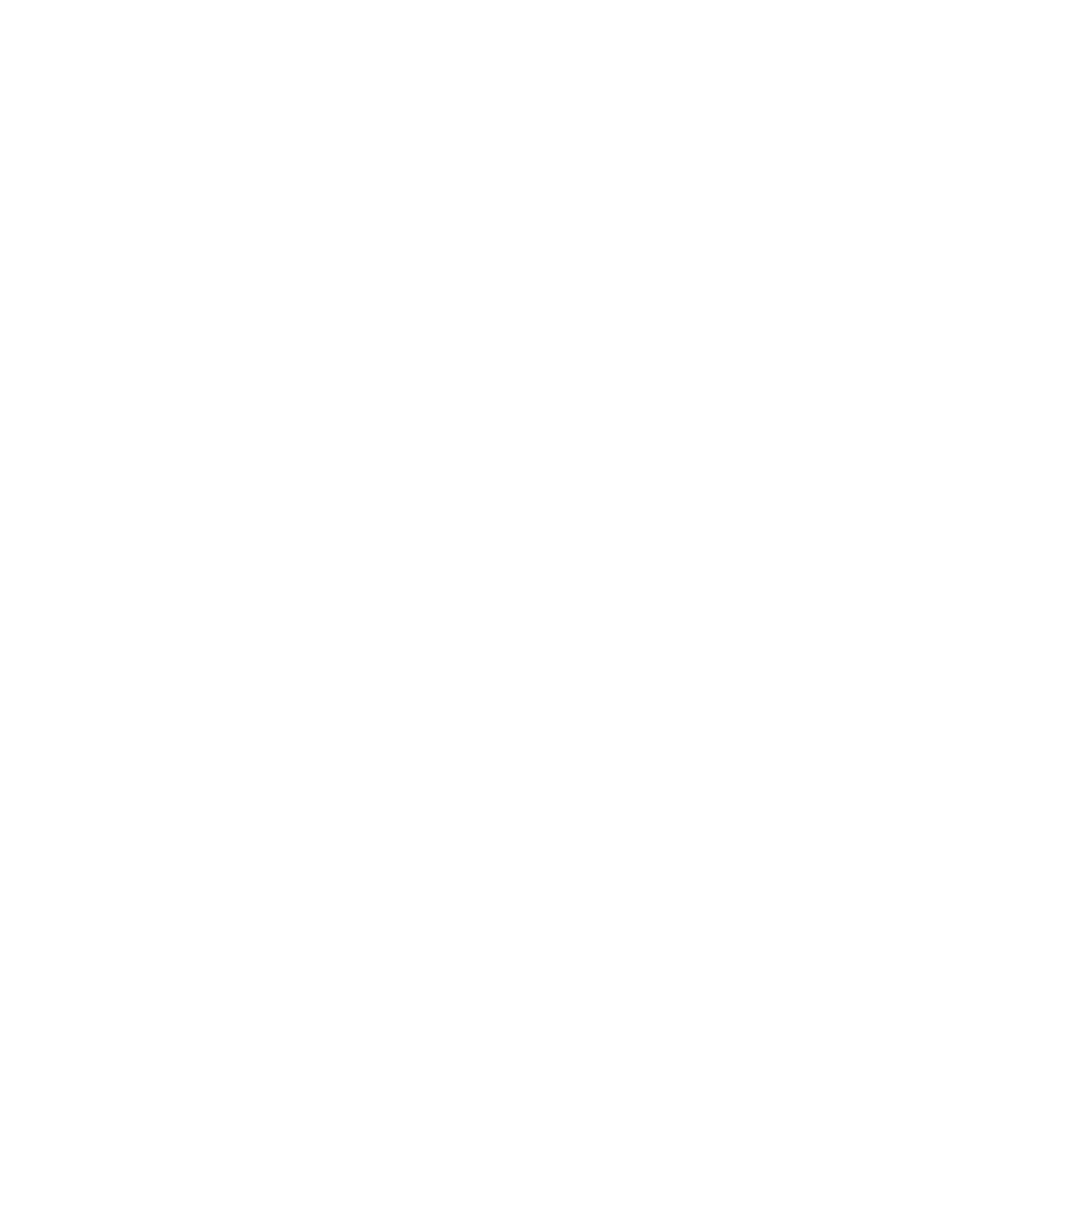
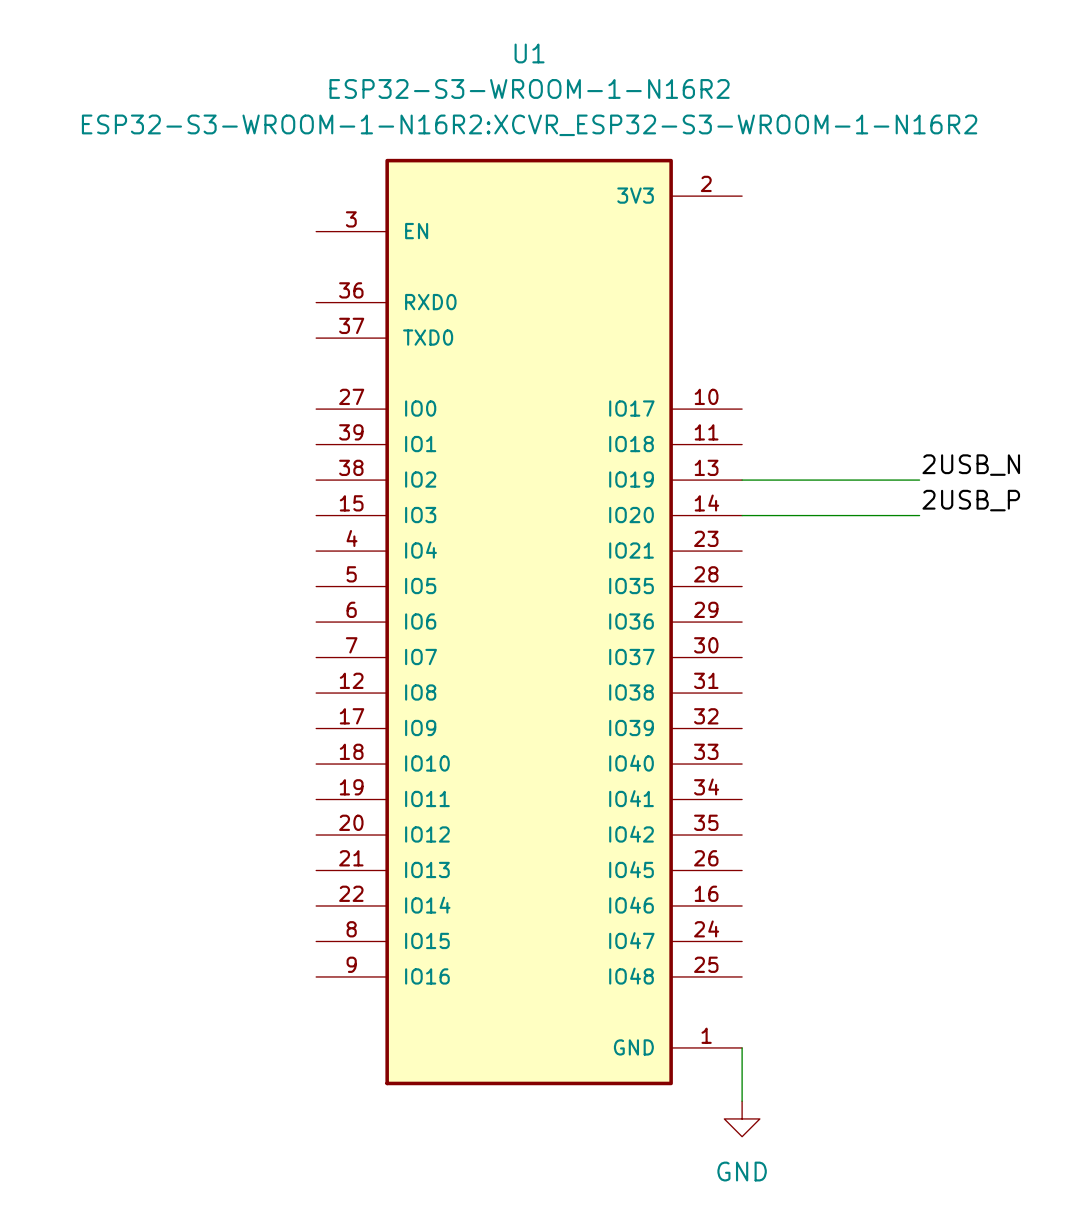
label: none -> 2USB_N (971, 465)
wire: none -> (742, 480) (919, 480)
label: none -> 2USB_P (971, 500)
wire: none -> (742, 515) (919, 515)
U1: none -> ESP32-S3-WROOM-1-N16R2 (529, 622)
wire: none -> (742, 1047) (742, 1101)
power symbol: none -> GND (742, 1118)

